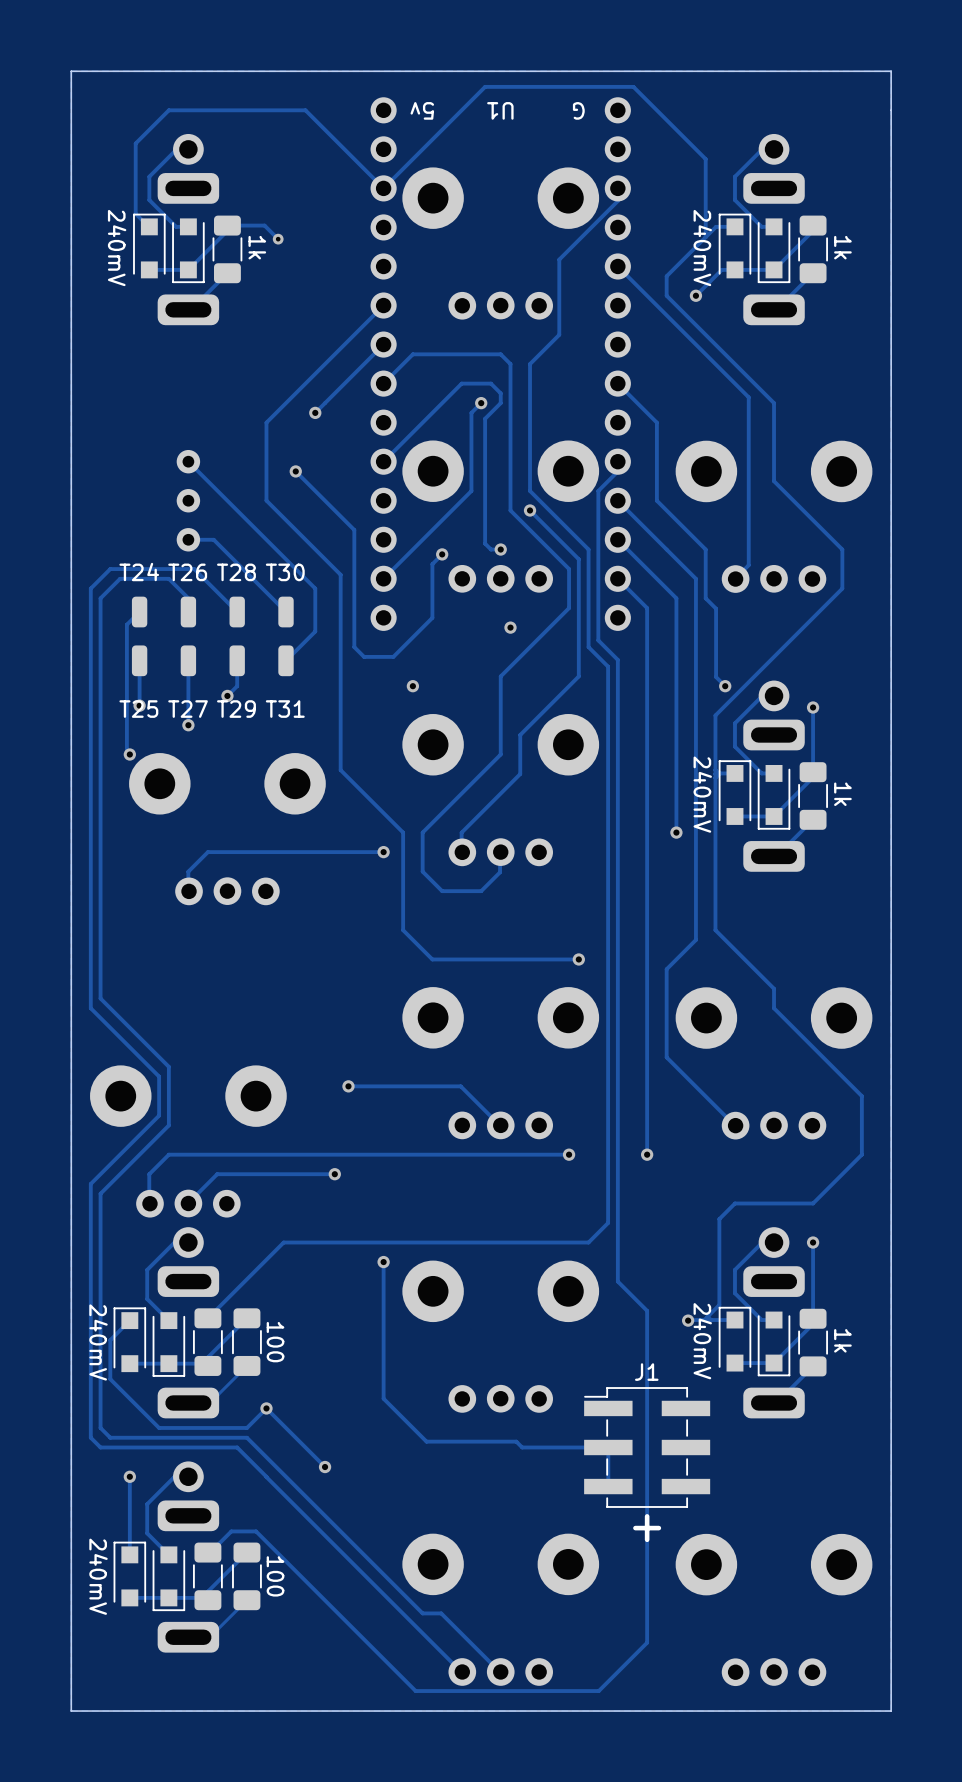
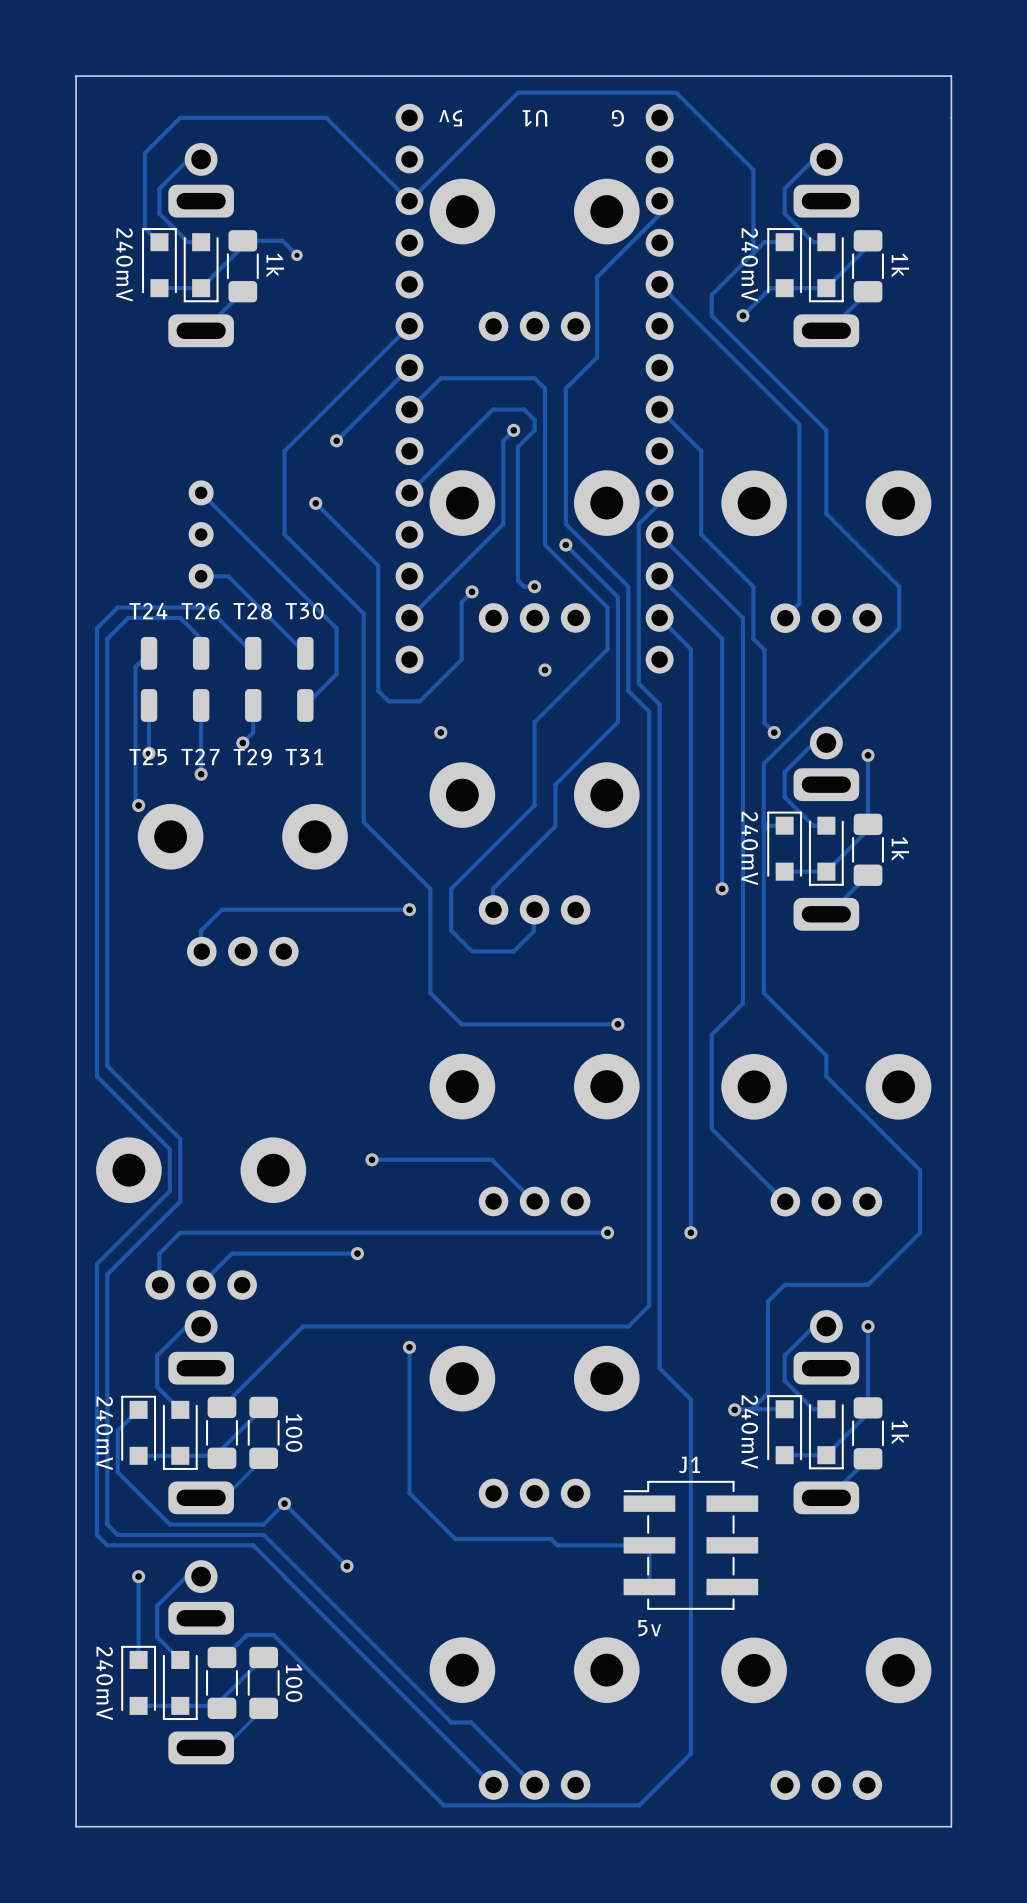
text: none -> 5v (649, 1628)
text: + (647, 1528) -> none

